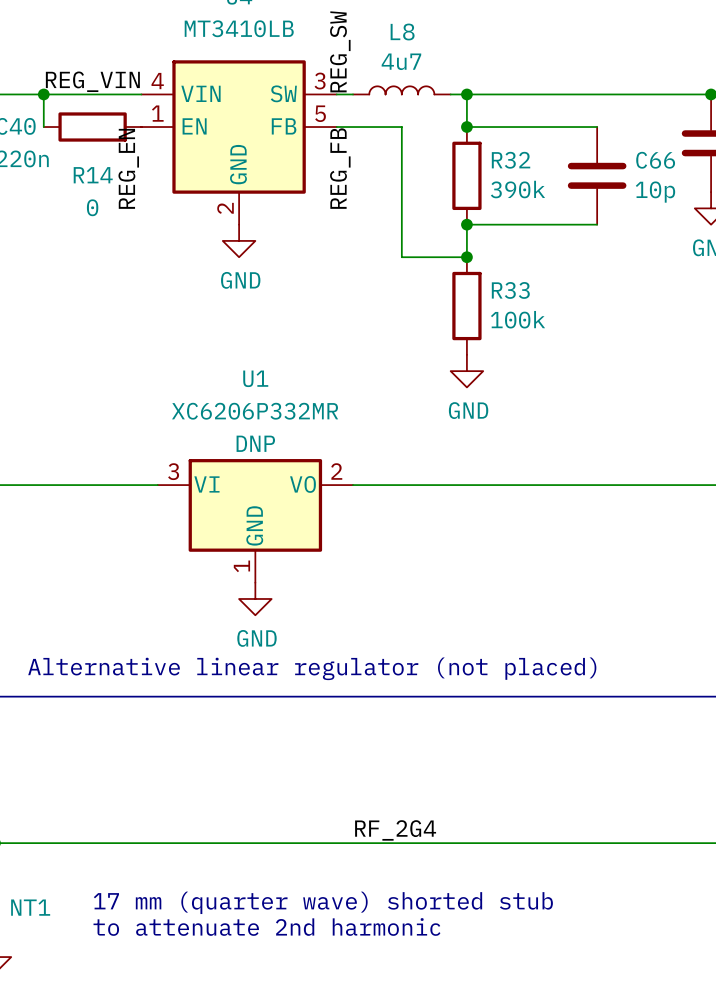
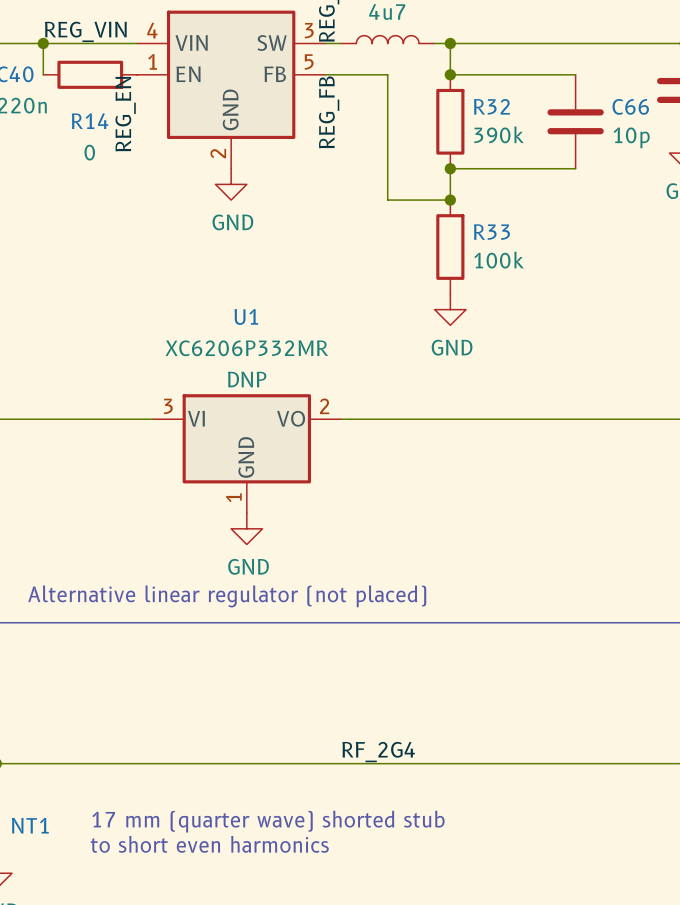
text: to attenuate 2nd harmonic (266, 927) -> to short even harmonics (209, 844)

